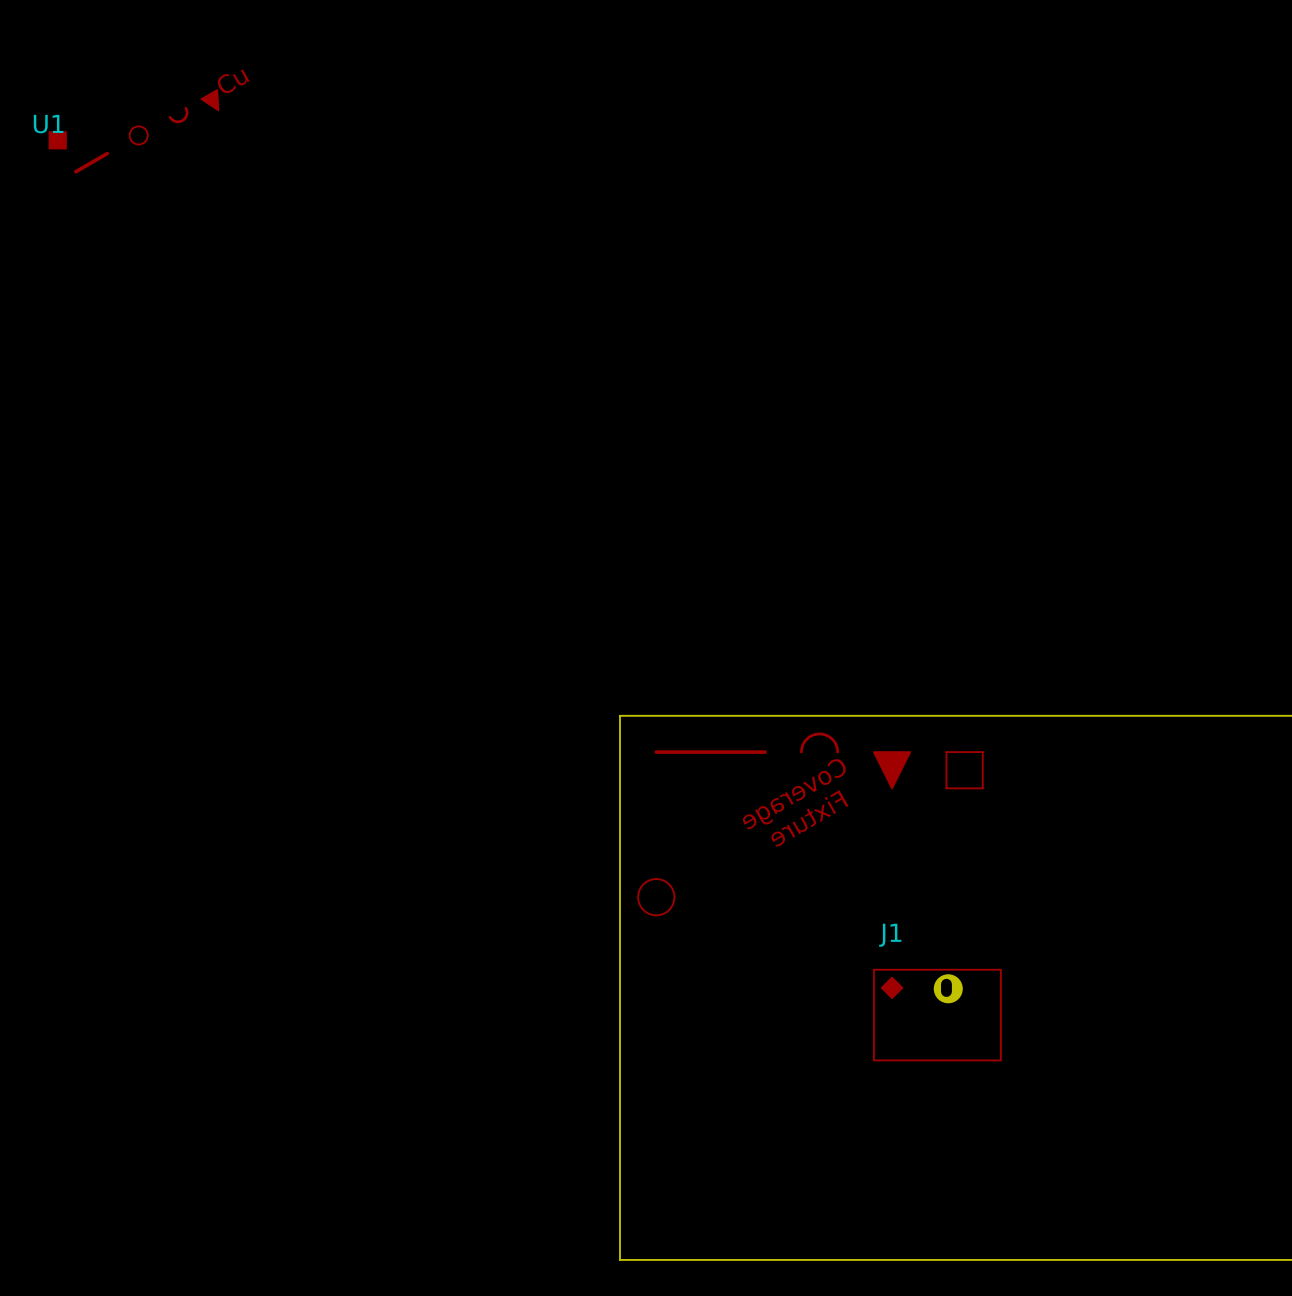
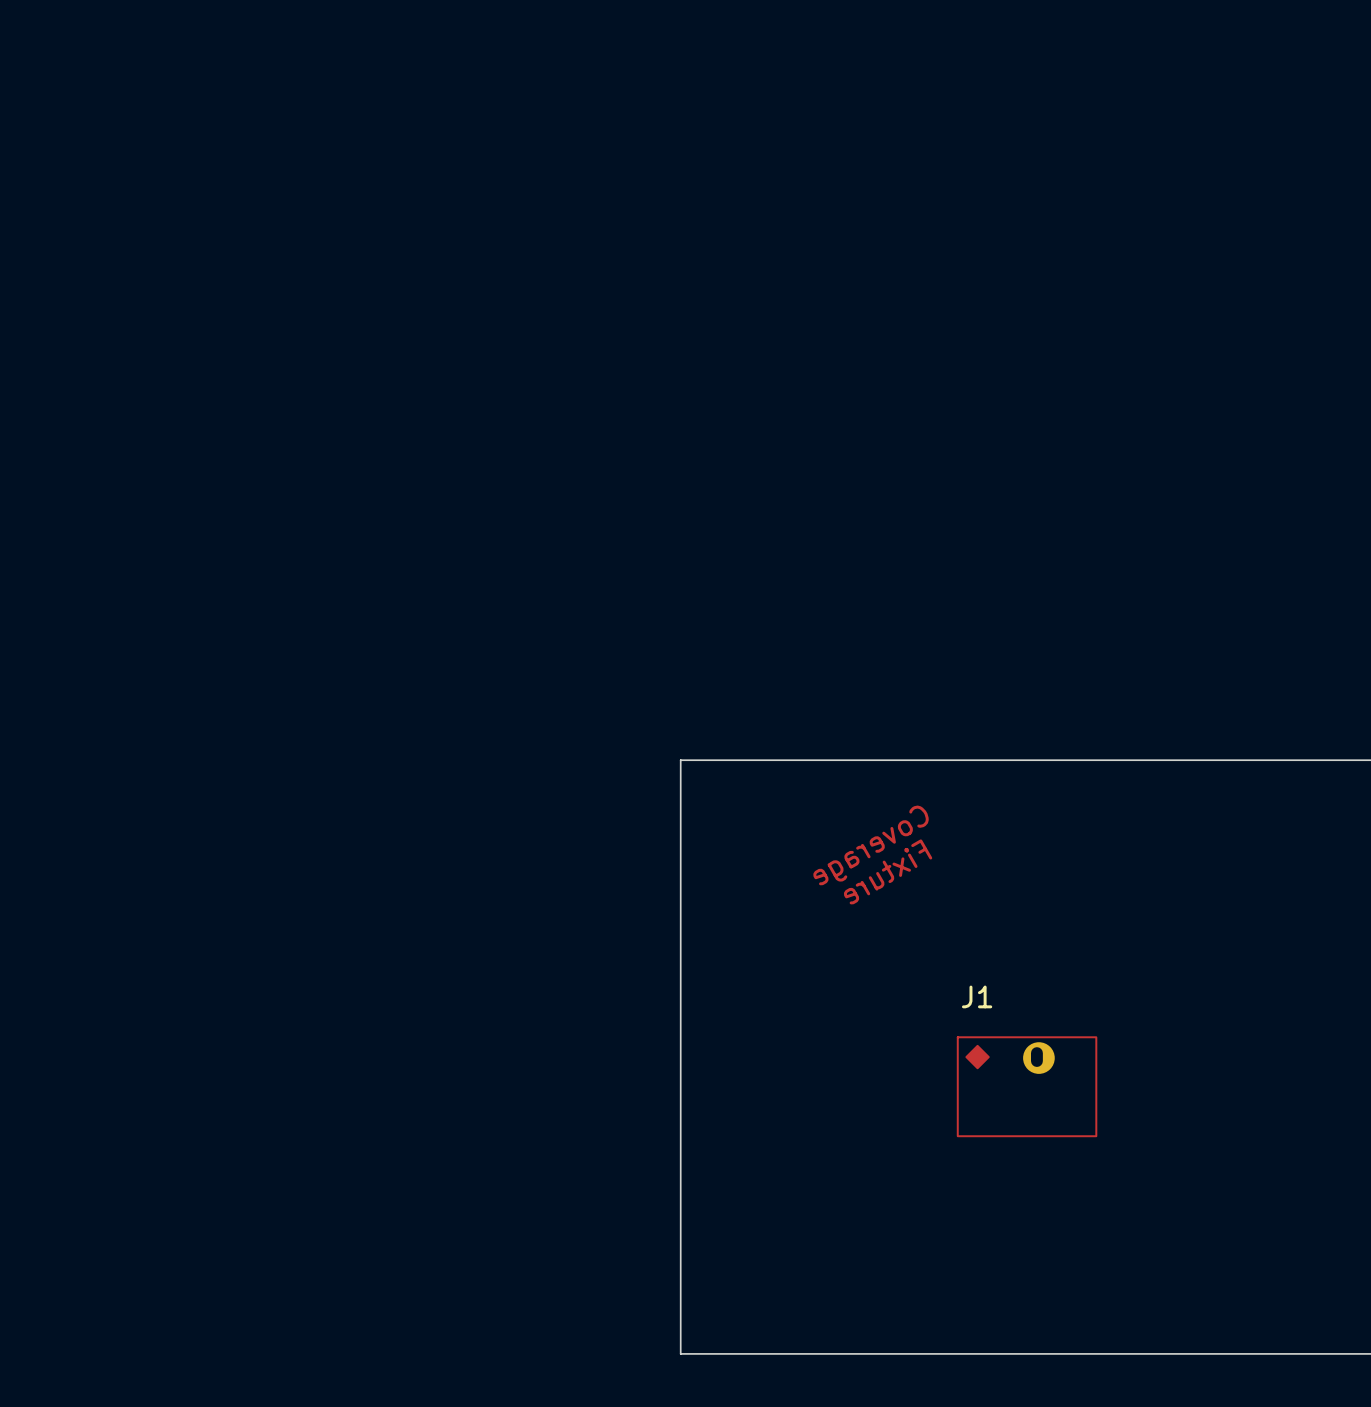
U1: (134, 131) -> none
drawing: [873, 751, 912, 790] -> none
top track: (656, 752) (765, 752) -> none
top track: (801, 752) (806, 739) (819, 733) (832, 739) (837, 752) -> none
top track: (946, 752) (982, 752) (982, 788) (946, 788) (946, 752) -> none
drawing: [637, 878, 676, 917] -> none

